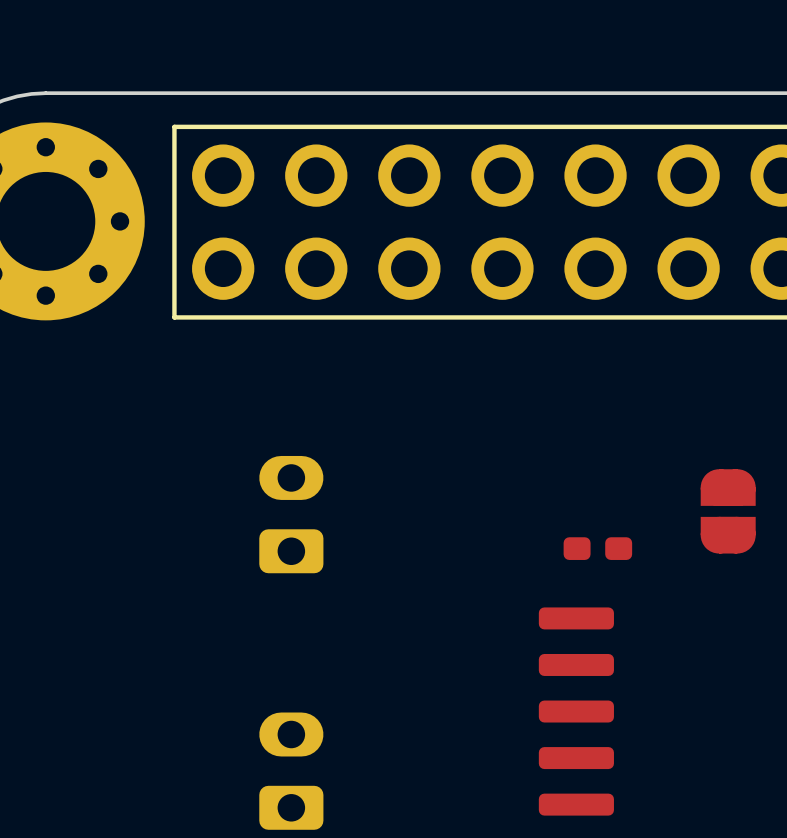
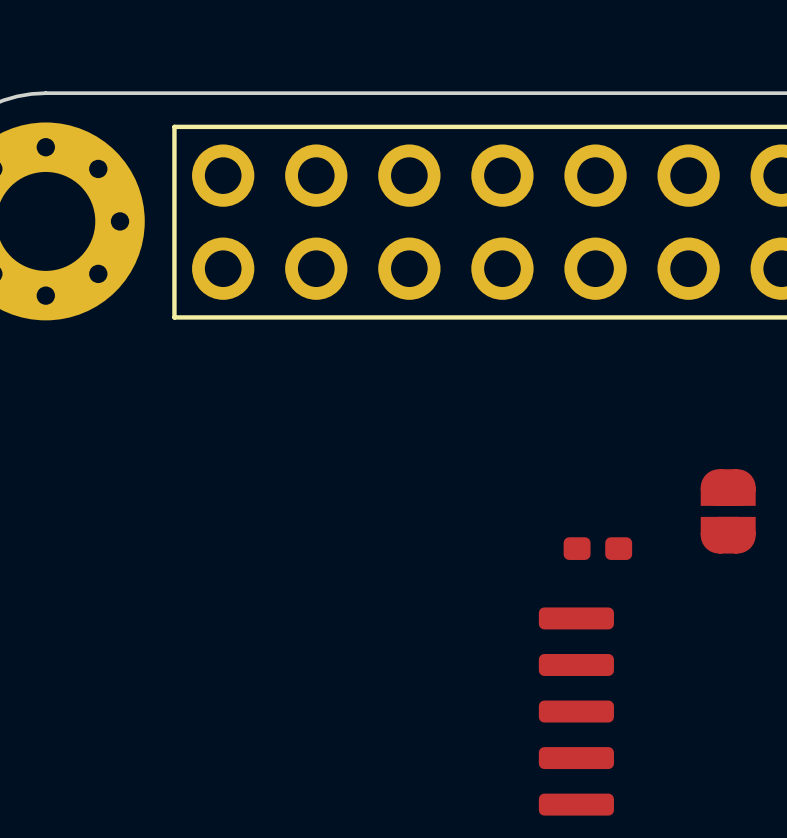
part: (291, 514) -> none
part: (291, 771) -> none

